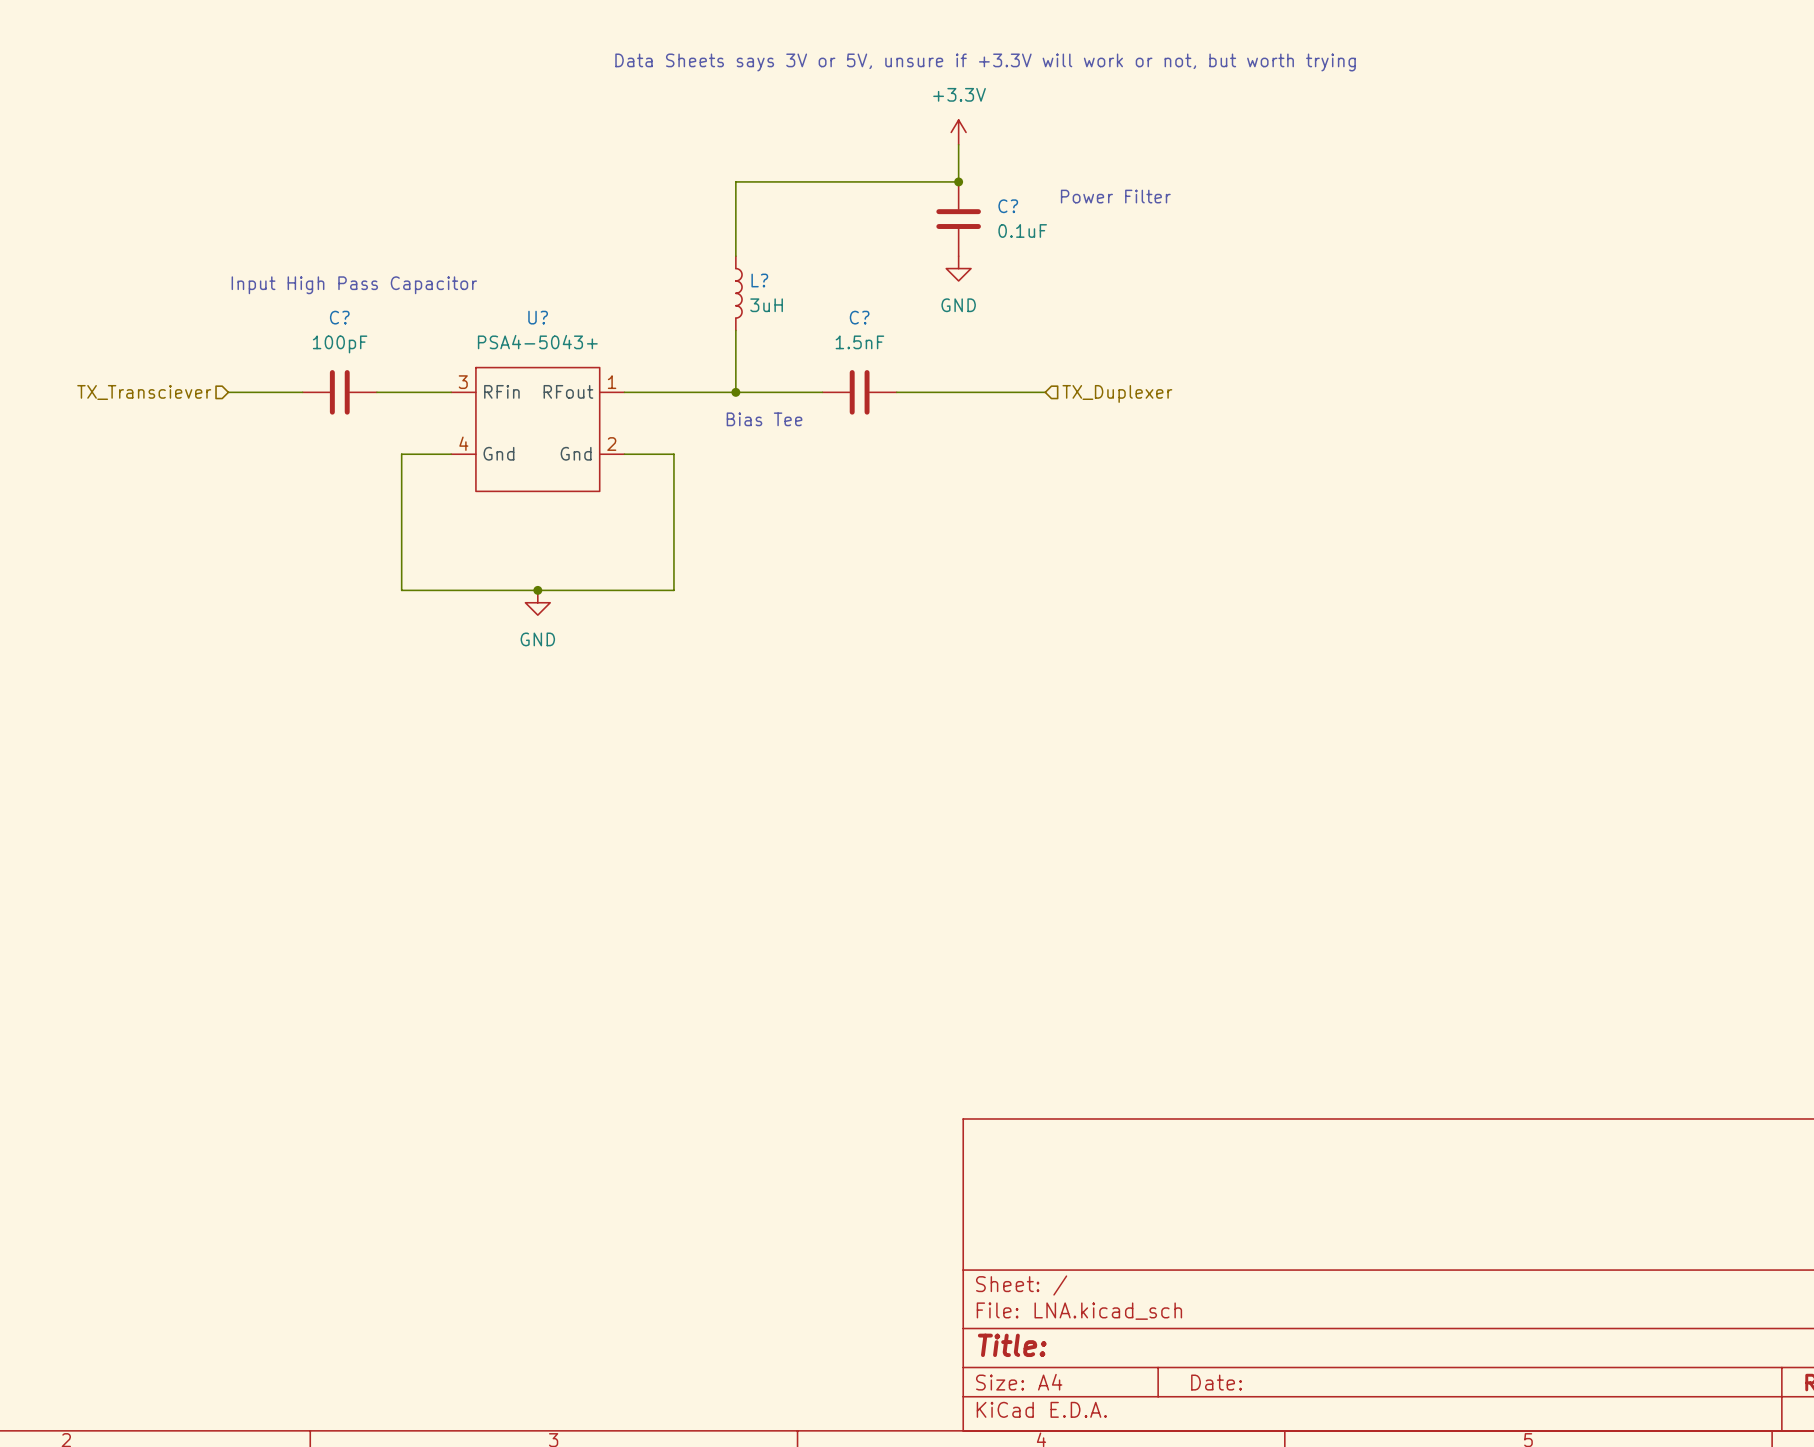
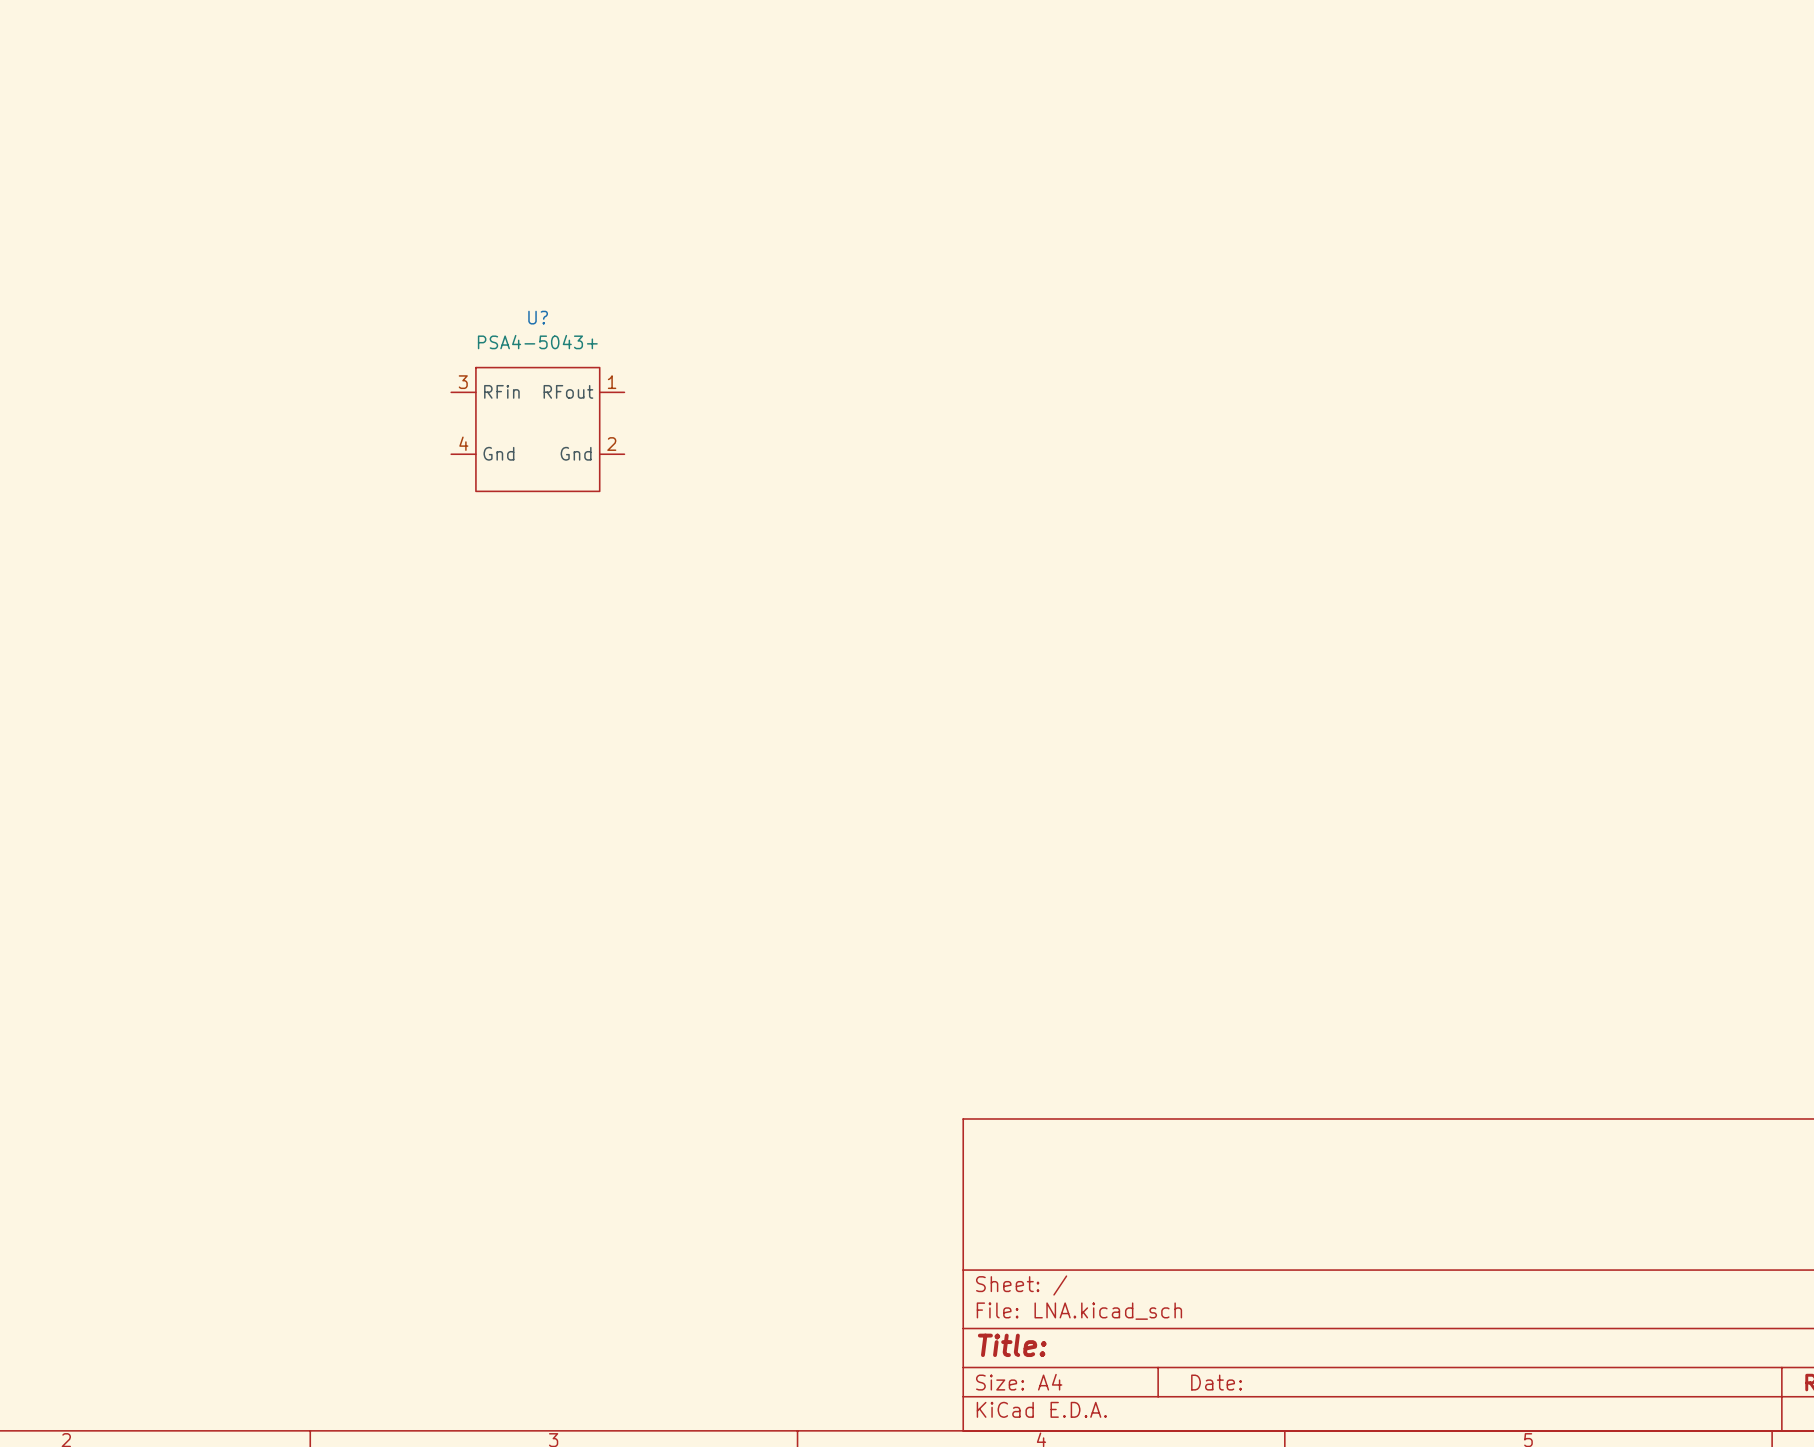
text: Data Sheets says 3V or 5V, unsure if +3.3V will work or not, but worth trying (985, 62) -> none
power symbol: +3.3V (958, 132) -> none
wire: (958, 144) (958, 181) (735, 181) (735, 256) -> none
junction: (958, 181) -> none
text: Power Filter (1115, 196) -> none
C?: 0.1uF (958, 219) -> none
power symbol: GND (958, 268) -> none
text: Input High Pass Capacitor (354, 285) -> none
L?: 3uH (738, 293) -> none
wire: (735, 330) (735, 392) -> none
hierarchical label: TX_Transciever (144, 392) -> none
wire: (228, 392) (302, 392) -> none
C?: 100pF (339, 392) -> none
wire: (376, 392) (451, 392) -> none
wire: (624, 392) (822, 392) -> none
junction: (735, 392) -> none
C?: 1.5nF (859, 392) -> none
wire: (896, 392) (1045, 392) -> none
hierarchical label: TX_Duplexer (1117, 393) -> none
text: Bias Tee (764, 419) -> none
wire: (451, 454) (401, 454) (401, 590) (673, 590) (673, 454) (624, 454) -> none
junction: (537, 590) -> none
power symbol: GND (537, 602) -> none

